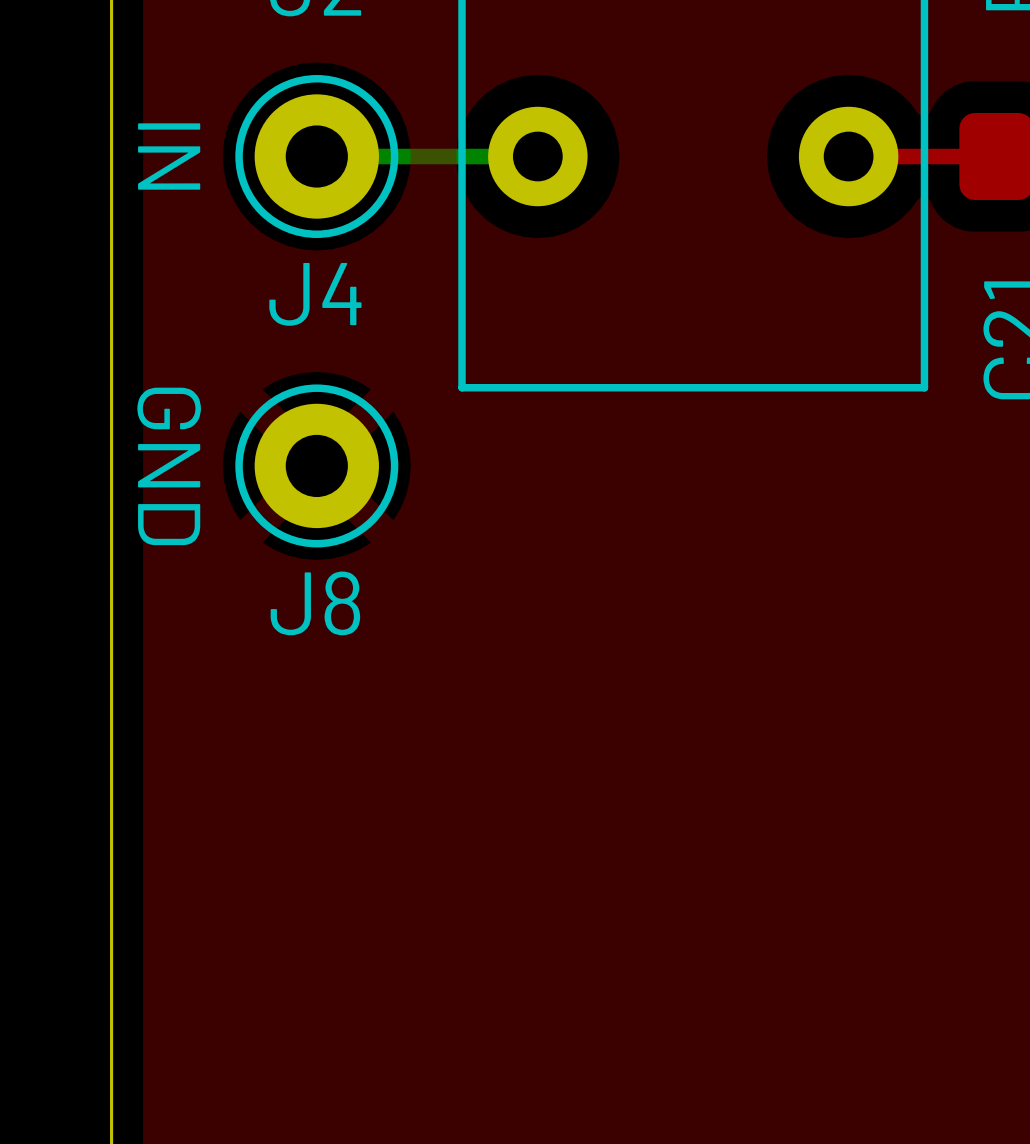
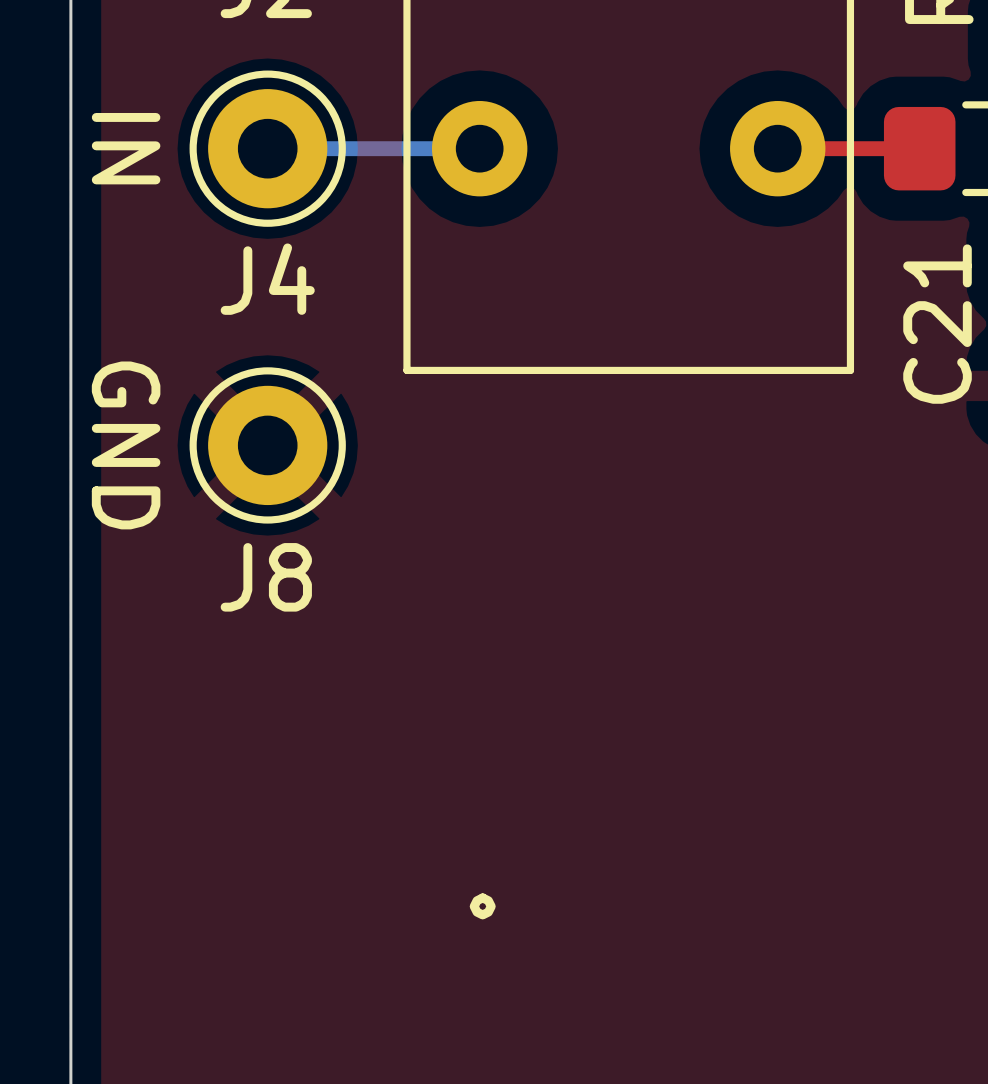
text: none -> ° (482, 906)

